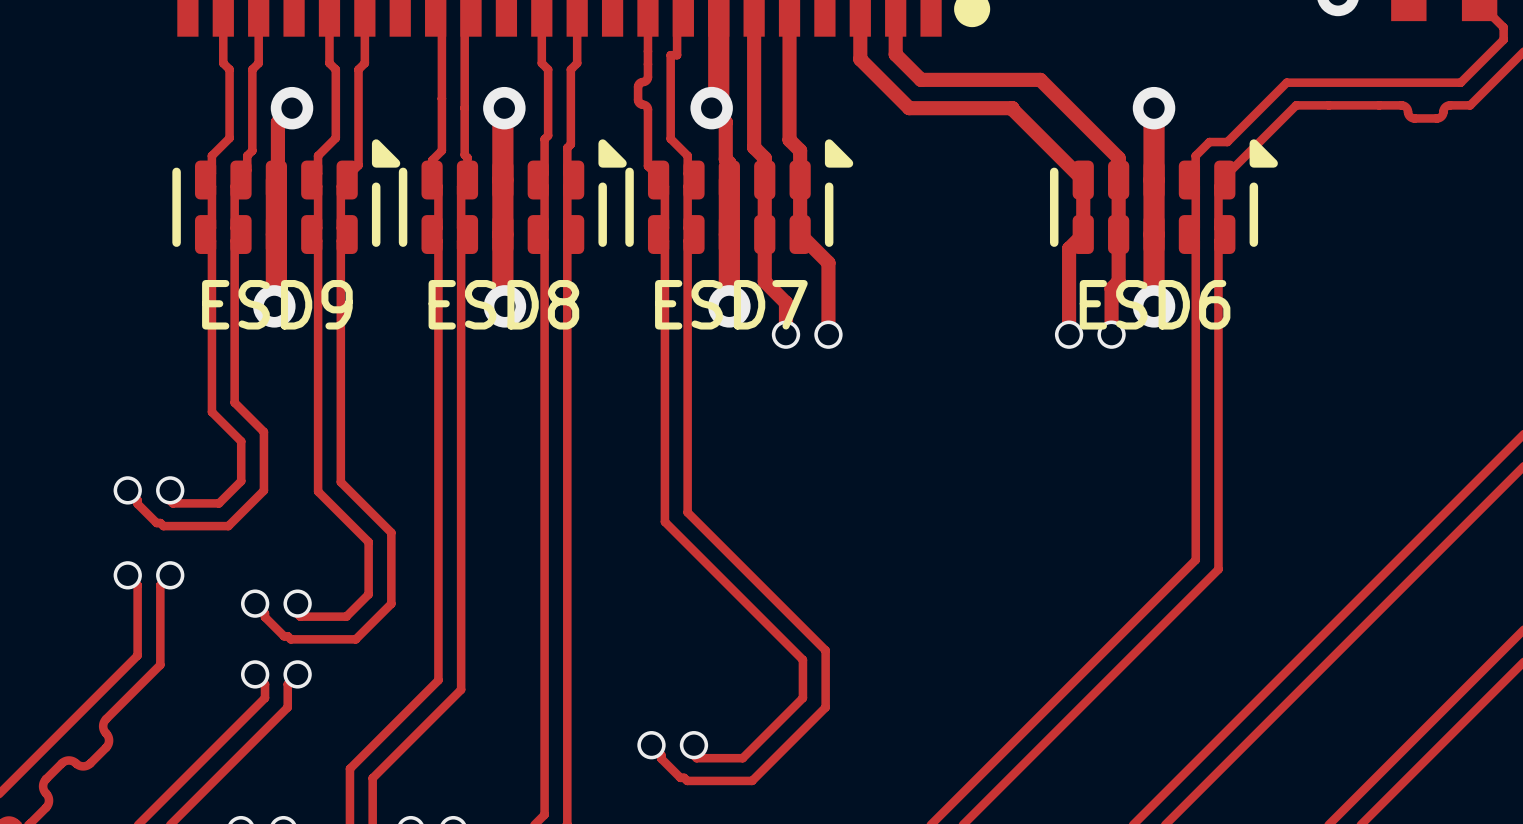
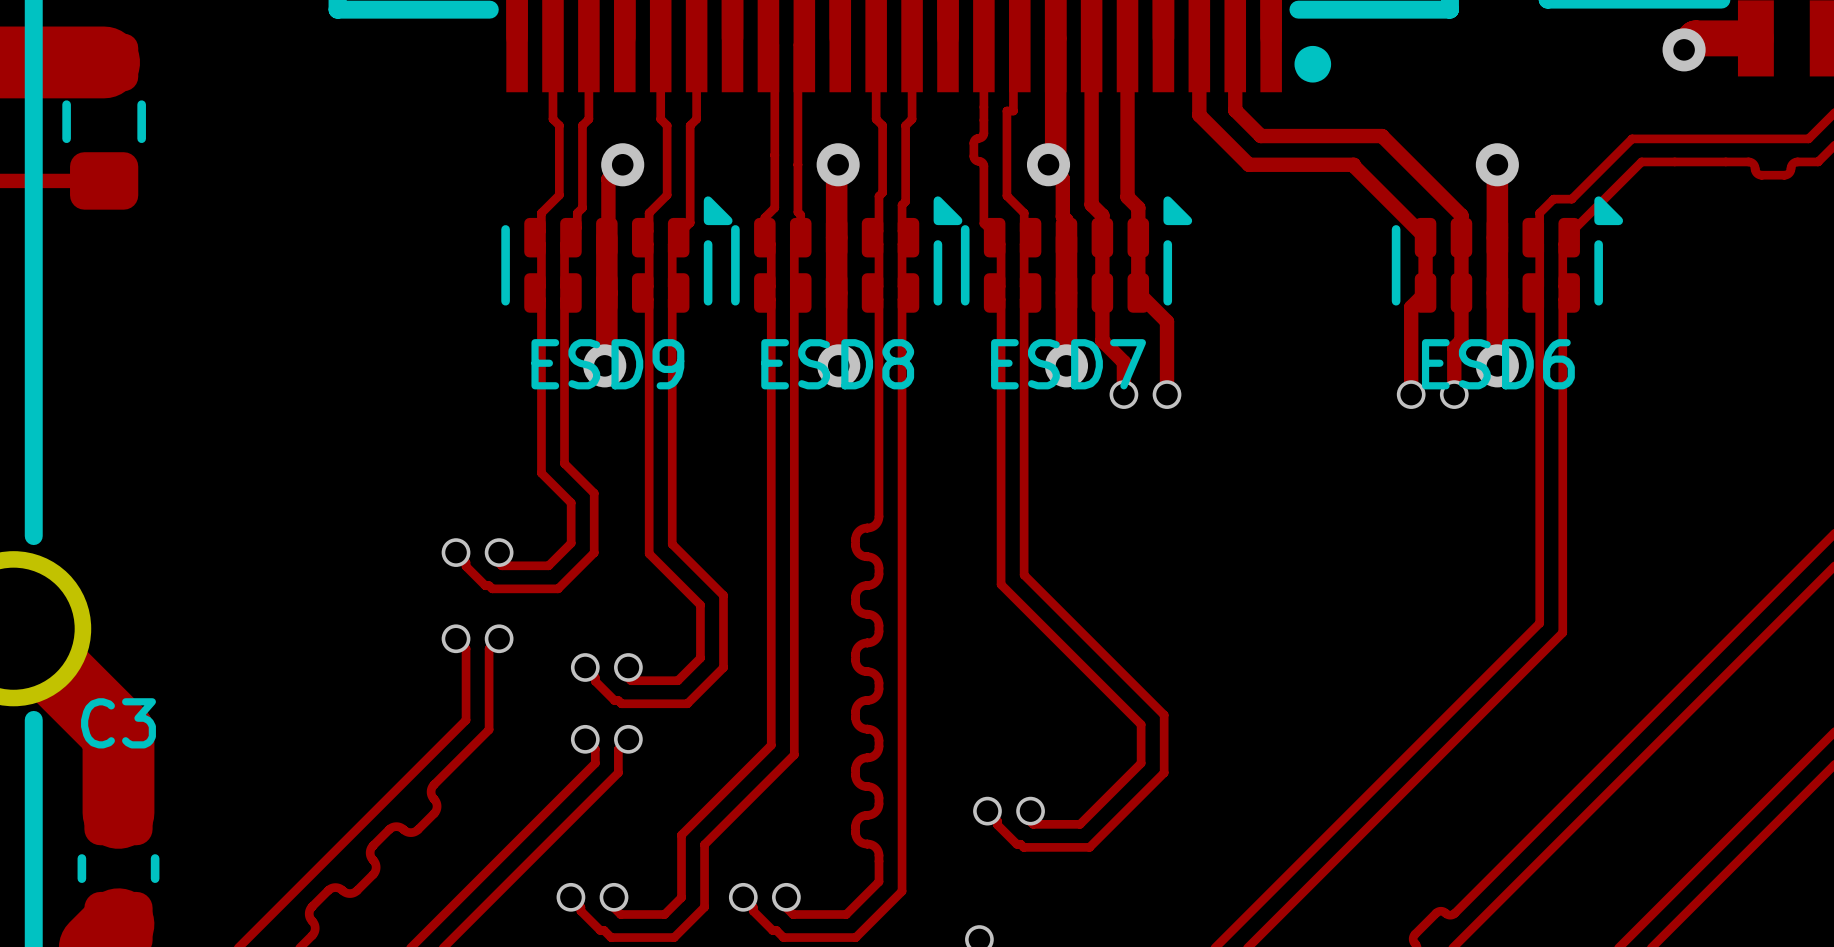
track: (544, 454) (544, 505) -> (879, 516) (875, 524) (867, 528)
track: none -> (867, 528) (858, 531) (855, 539) (857, 551) (861, 555) (867, 556)
track: none -> (867, 556) (875, 560) (879, 568)
track: (544, 511) (544, 562) -> (867, 614) (875, 617) (879, 625)
track: none -> (879, 574) (875, 582) (867, 585)
track: none -> (867, 585) (858, 588) (855, 596) (857, 608) (861, 612) (867, 614)
track: (544, 568) (544, 619) -> (879, 631) (875, 639) (867, 642)
track: none -> (867, 642) (858, 646) (855, 654) (857, 665) (861, 670) (867, 671)
track: none -> (867, 671) (875, 675) (879, 683)
track: (544, 624) (544, 675) -> (879, 688) (875, 697) (867, 700)
track: none -> (867, 700) (858, 703) (855, 711) (857, 723) (861, 727) (867, 729)
track: none -> (867, 729) (875, 732) (879, 740)
track: (544, 681) (544, 732) -> (867, 786) (875, 789) (879, 798)
track: none -> (879, 746) (875, 754) (867, 757)
track: none -> (867, 757) (858, 761) (855, 769) (857, 780) (861, 785) (867, 786)
track: (544, 737) (544, 788) -> (879, 803) (875, 811) (867, 815)
track: none -> (867, 815) (858, 818) (855, 826) (857, 838) (861, 842) (867, 844)
track: none -> (867, 844) (875, 847) (879, 855)

